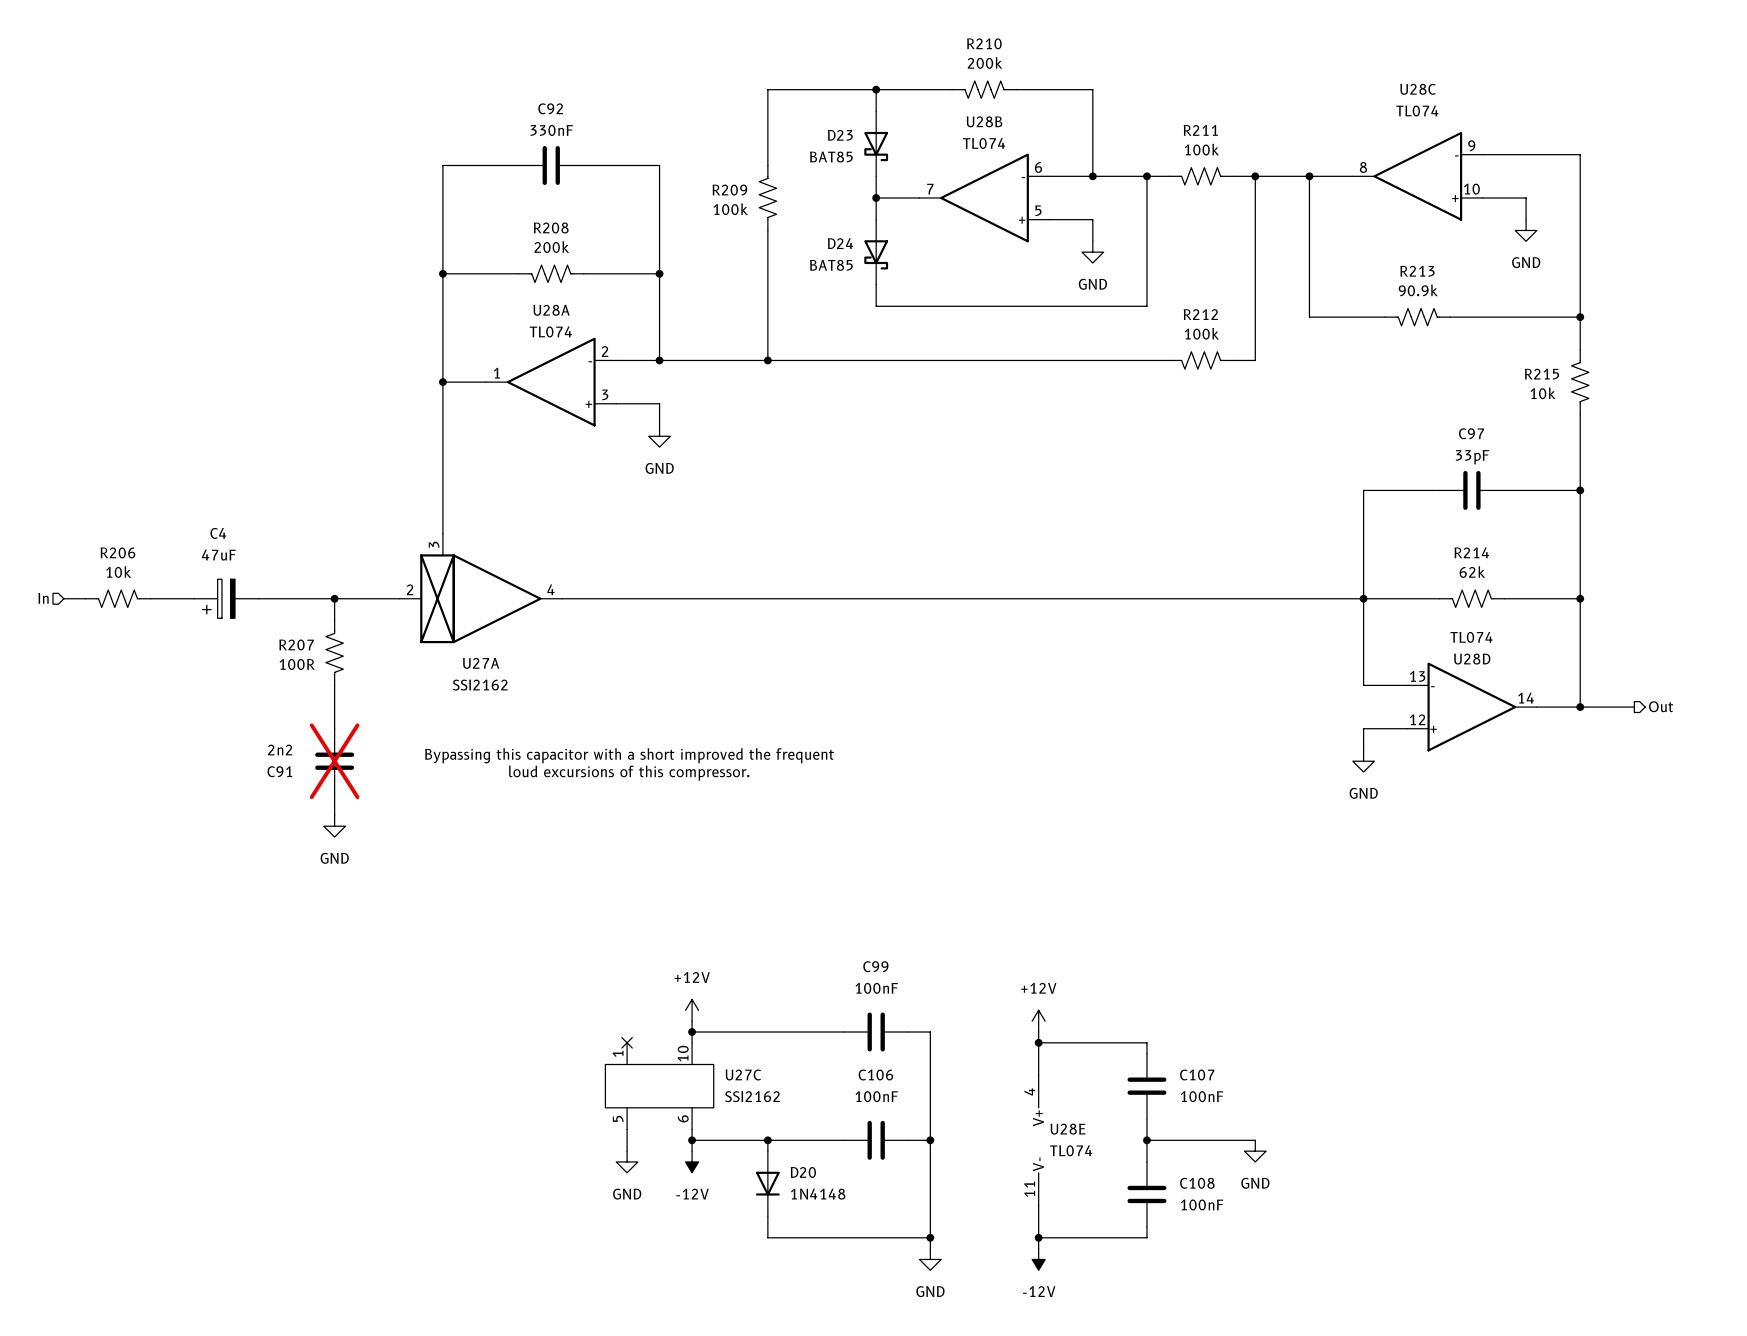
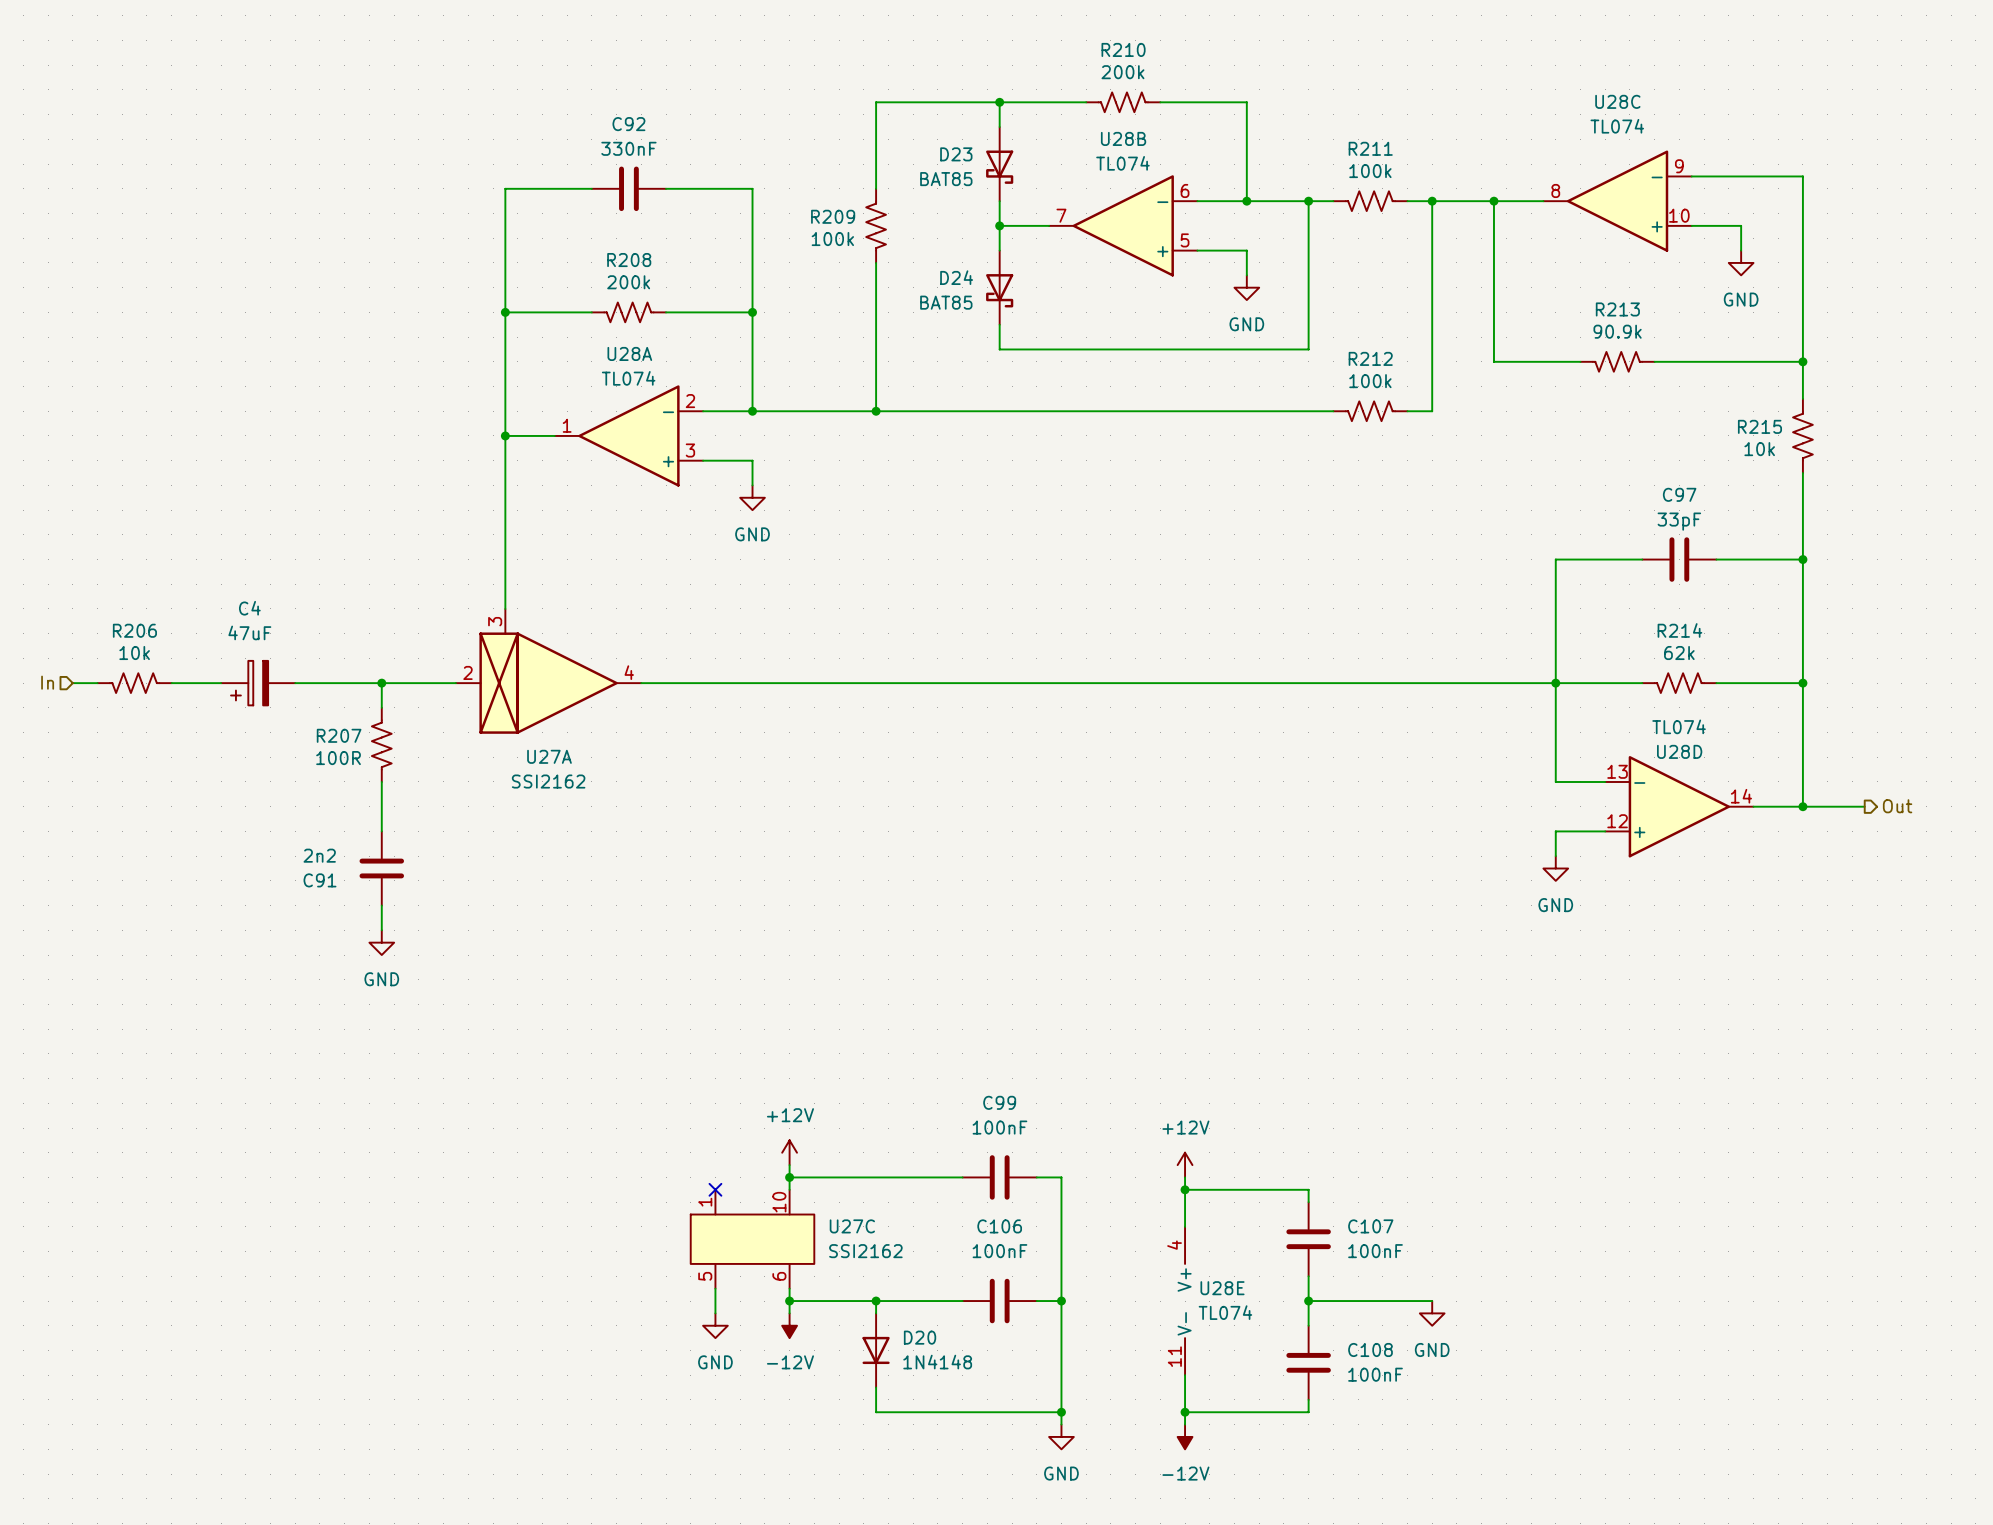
text: Bypassing this capacitor with a short improved the frequent (629, 755) -> none
C91 do-not-place cross: (334, 761) -> none
text: loud excursions of this compressor. (629, 773) -> none

